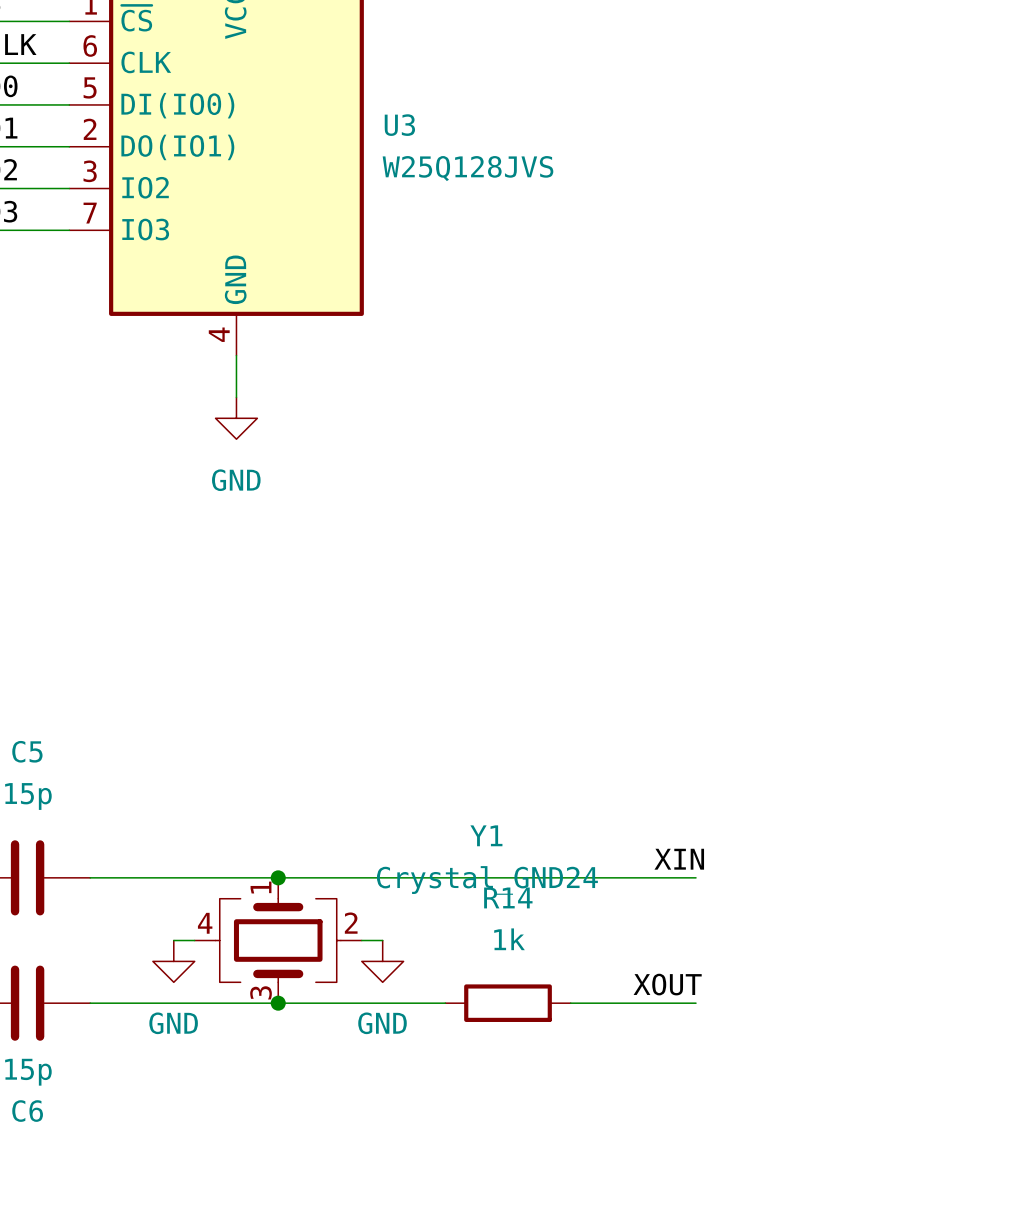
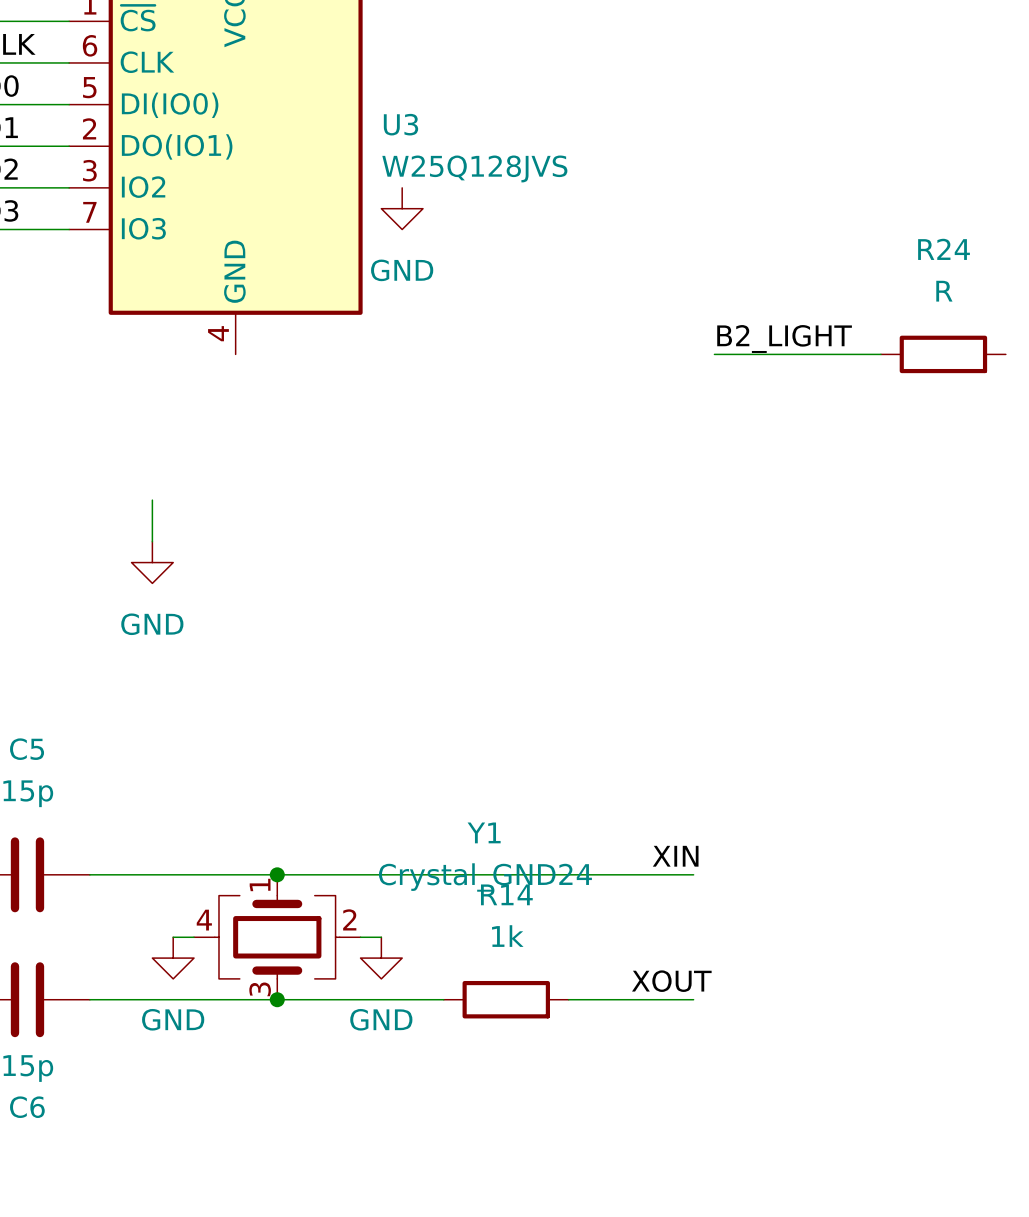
power symbol: none -> GND (402, 208)
label: none -> B2_LIGHT (784, 339)
wire: (236, 355) (236, 397) -> (152, 500) (152, 541)
wire: none -> (714, 354) (880, 354)
R24: none -> R (943, 354)
power symbol: GND (236, 418) -> none
power symbol: none -> GND (152, 562)

